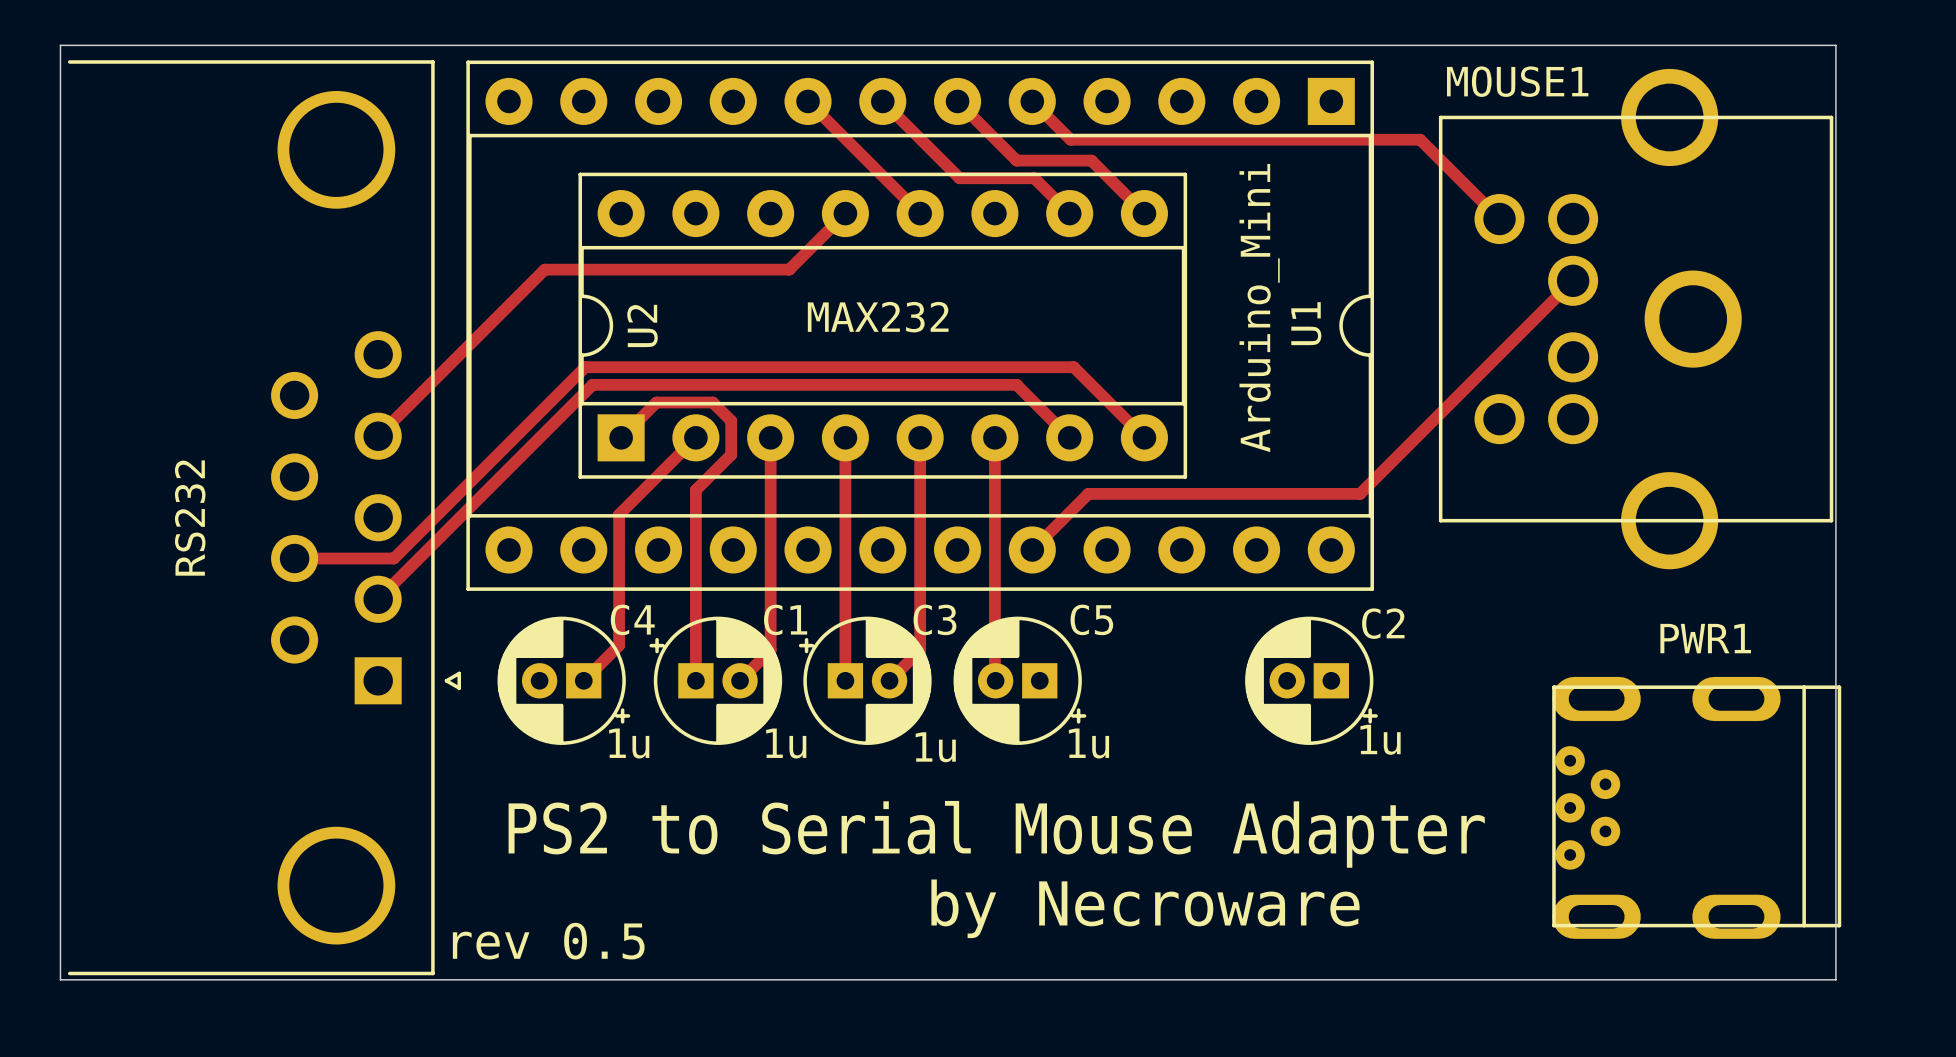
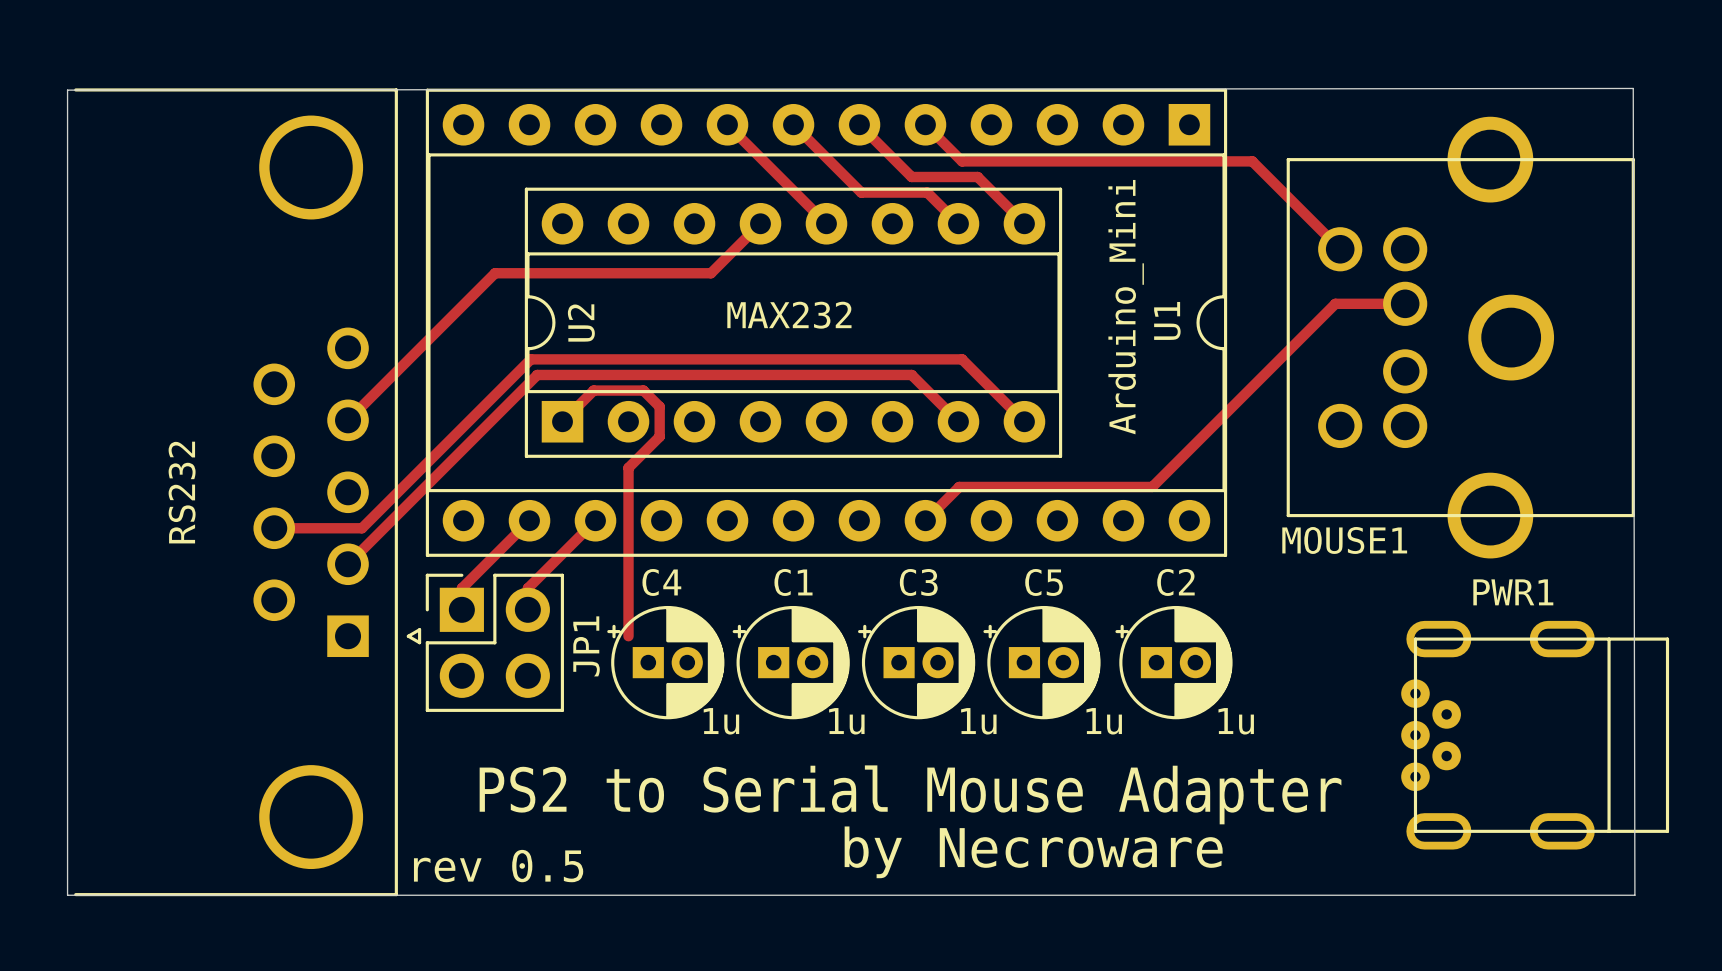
board edge: (60, 62) (60, 45) (1835, 45) (1835, 979) (60, 979) (60, 974) -> (67, 90) (1633, 88) (1634, 895) (67, 895)
MOUSE1 name position: MOUSE1 (1517, 81) -> MOUSE1 (1344, 540)
track: (1070, 139) (1420, 139) (1499, 219) -> (959, 158) (962, 161) (1252, 161) (1340, 249)
track: (1573, 280) (1360, 493) (1088, 493) (1070, 511) -> (1405, 303) (1335, 303) (1152, 486) (959, 486)
MOUSE1 position: (1636, 319) -> (1460, 337)
track: (695, 437) (619, 514) (619, 645) (583, 680) -> none
track: (770, 437) (770, 650) (740, 680) -> none
track: (845, 437) (845, 680) -> none
track: (920, 437) (920, 650) (889, 680) -> none
track: (994, 437) (995, 680) -> none
track: none -> (529, 520) (461, 588) (461, 609)
track: none -> (595, 520) (527, 588) (527, 609)
C4 name position: C4 (632, 619) -> C4 (661, 582)
C1 name position: C1 (785, 619) -> C1 (793, 582)
C3 name position: C3 (934, 619) -> C3 (918, 582)
C5 name position: C5 (1091, 619) -> C5 (1044, 582)
C2 name position: C2 (1383, 623) -> C2 (1175, 582)
PWR1 footprint: [1552, 676, 1842, 939] -> [1401, 620, 1670, 850]
C4 rotation: 0° (563, 680) -> 180° (665, 662)
C4 position: (563, 680) -> (665, 662)
C1 position: (715, 680) -> (791, 662)
C3 position: (865, 680) -> (916, 662)
C5 rotation: 0° (1019, 680) -> 180° (1042, 662)
C5 position: (1019, 680) -> (1042, 662)
C2 rotation: 0° (1311, 680) -> 180° (1173, 662)
JP1: none -> (494, 642)
C1 value position: 1u (786, 743) -> 1u (846, 721)
text position: PS2 to Serial Mouse Adapter (996, 834) -> PS2 to Serial Mouse Adapter (910, 794)
text position: by Necroware (1145, 908) -> by Necroware (1033, 852)

